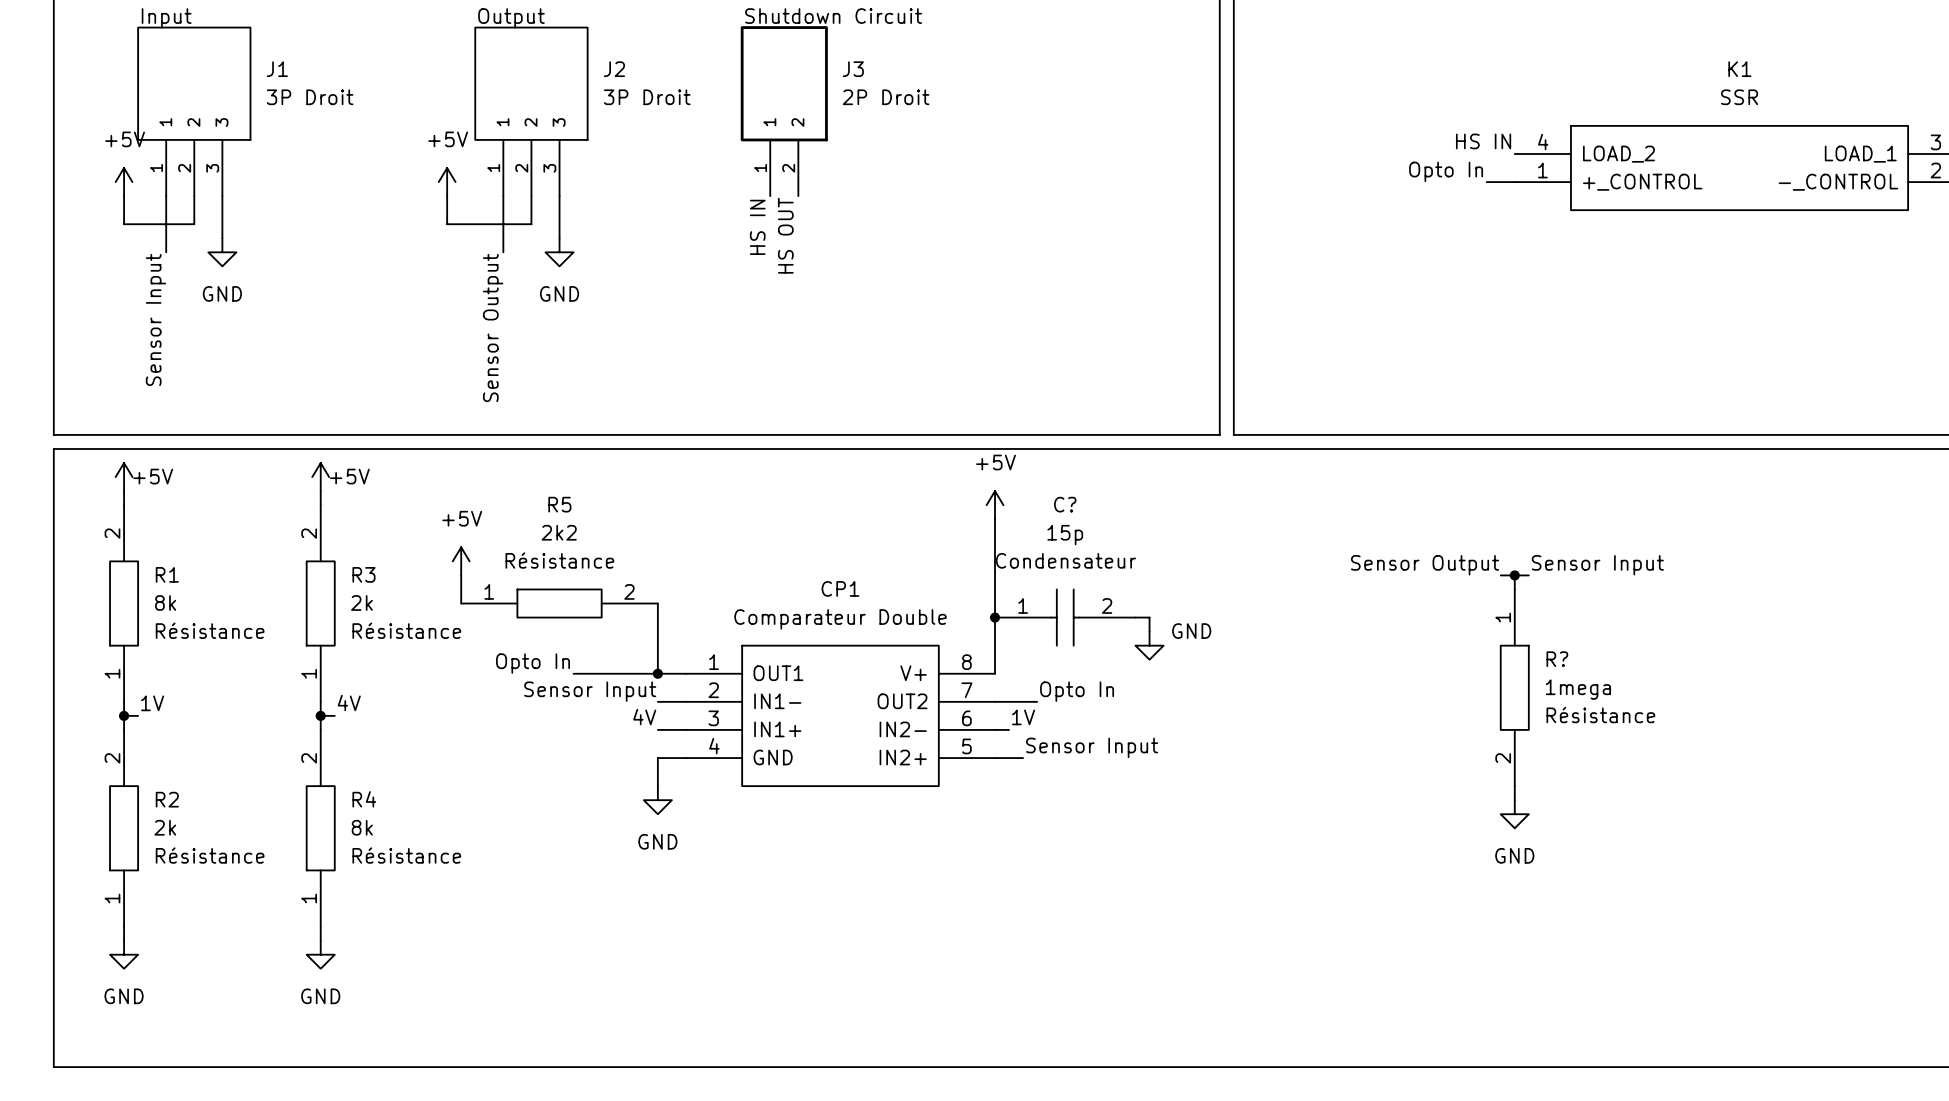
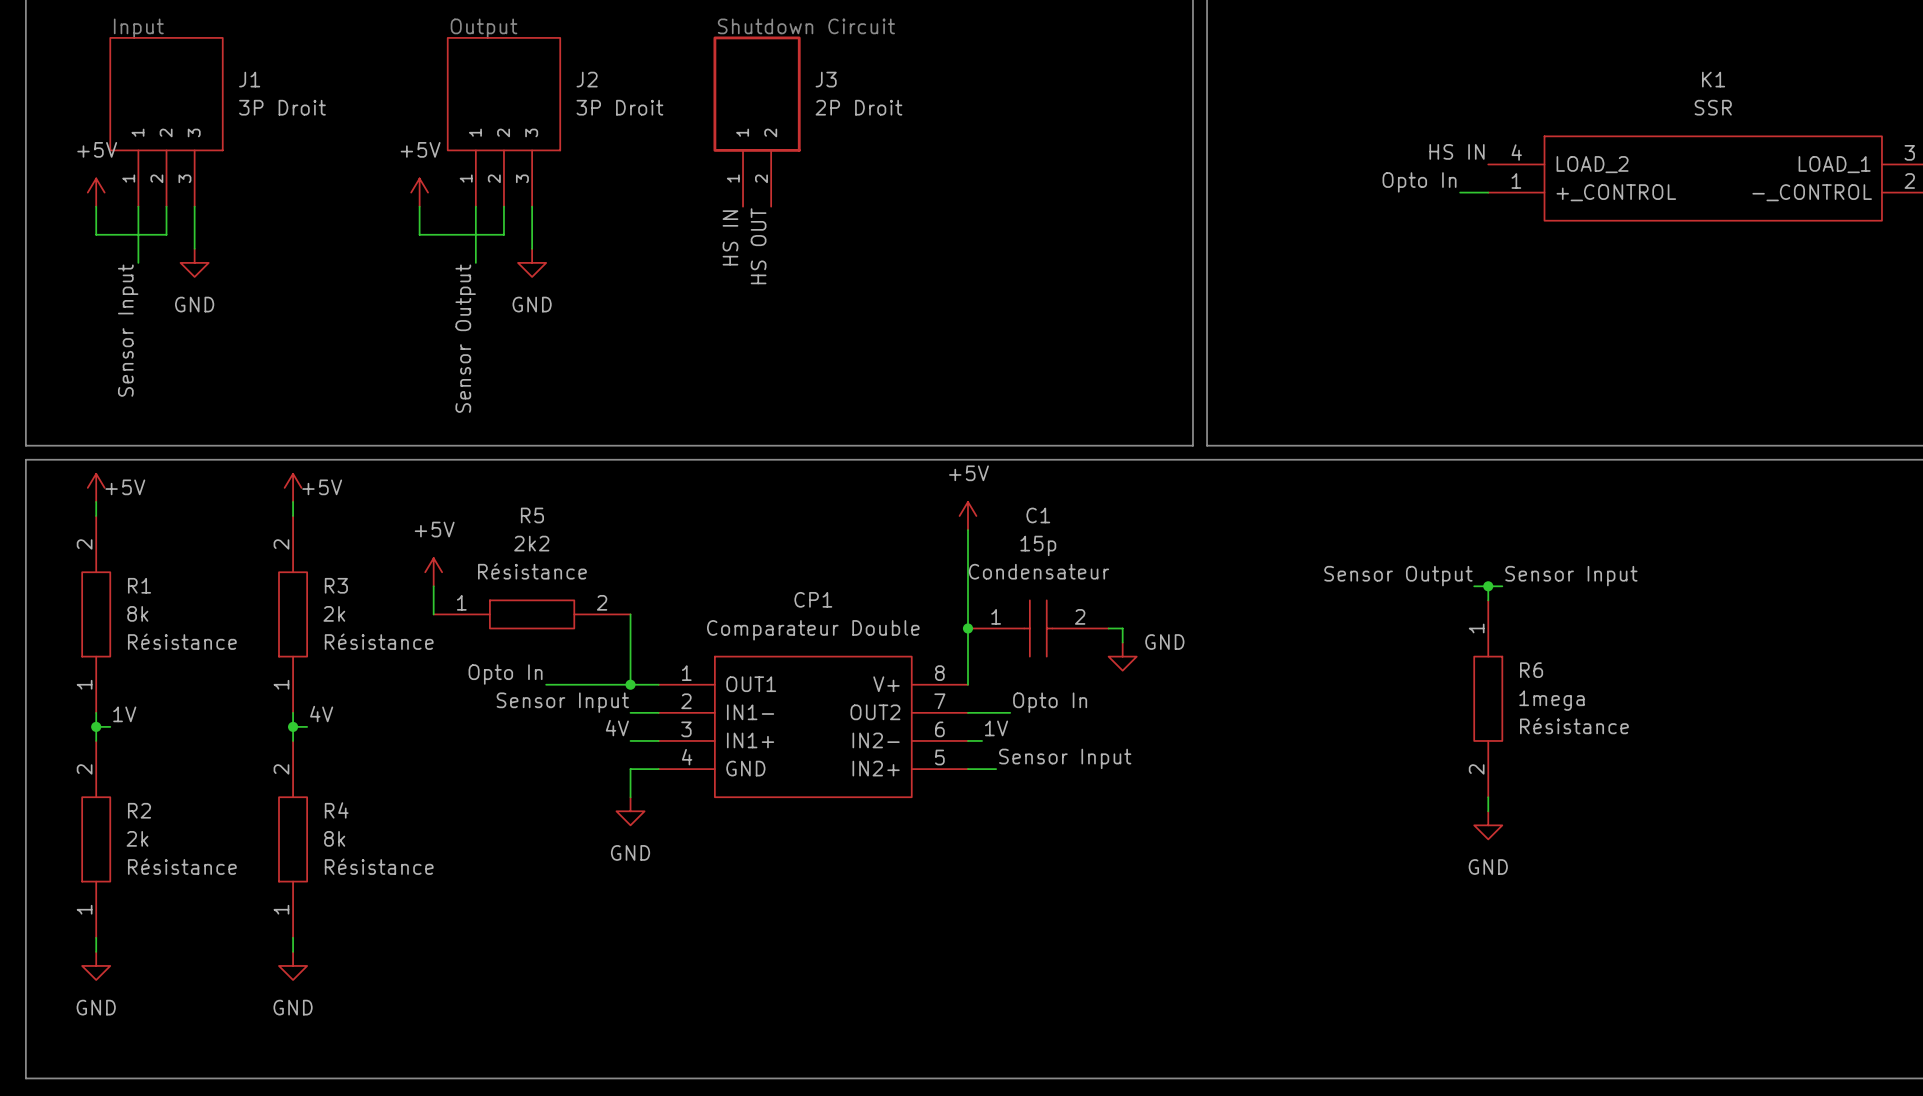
C? name: C? (1065, 504) -> C1 (1038, 515)
R? name: R? (1557, 659) -> R6 (1531, 670)

